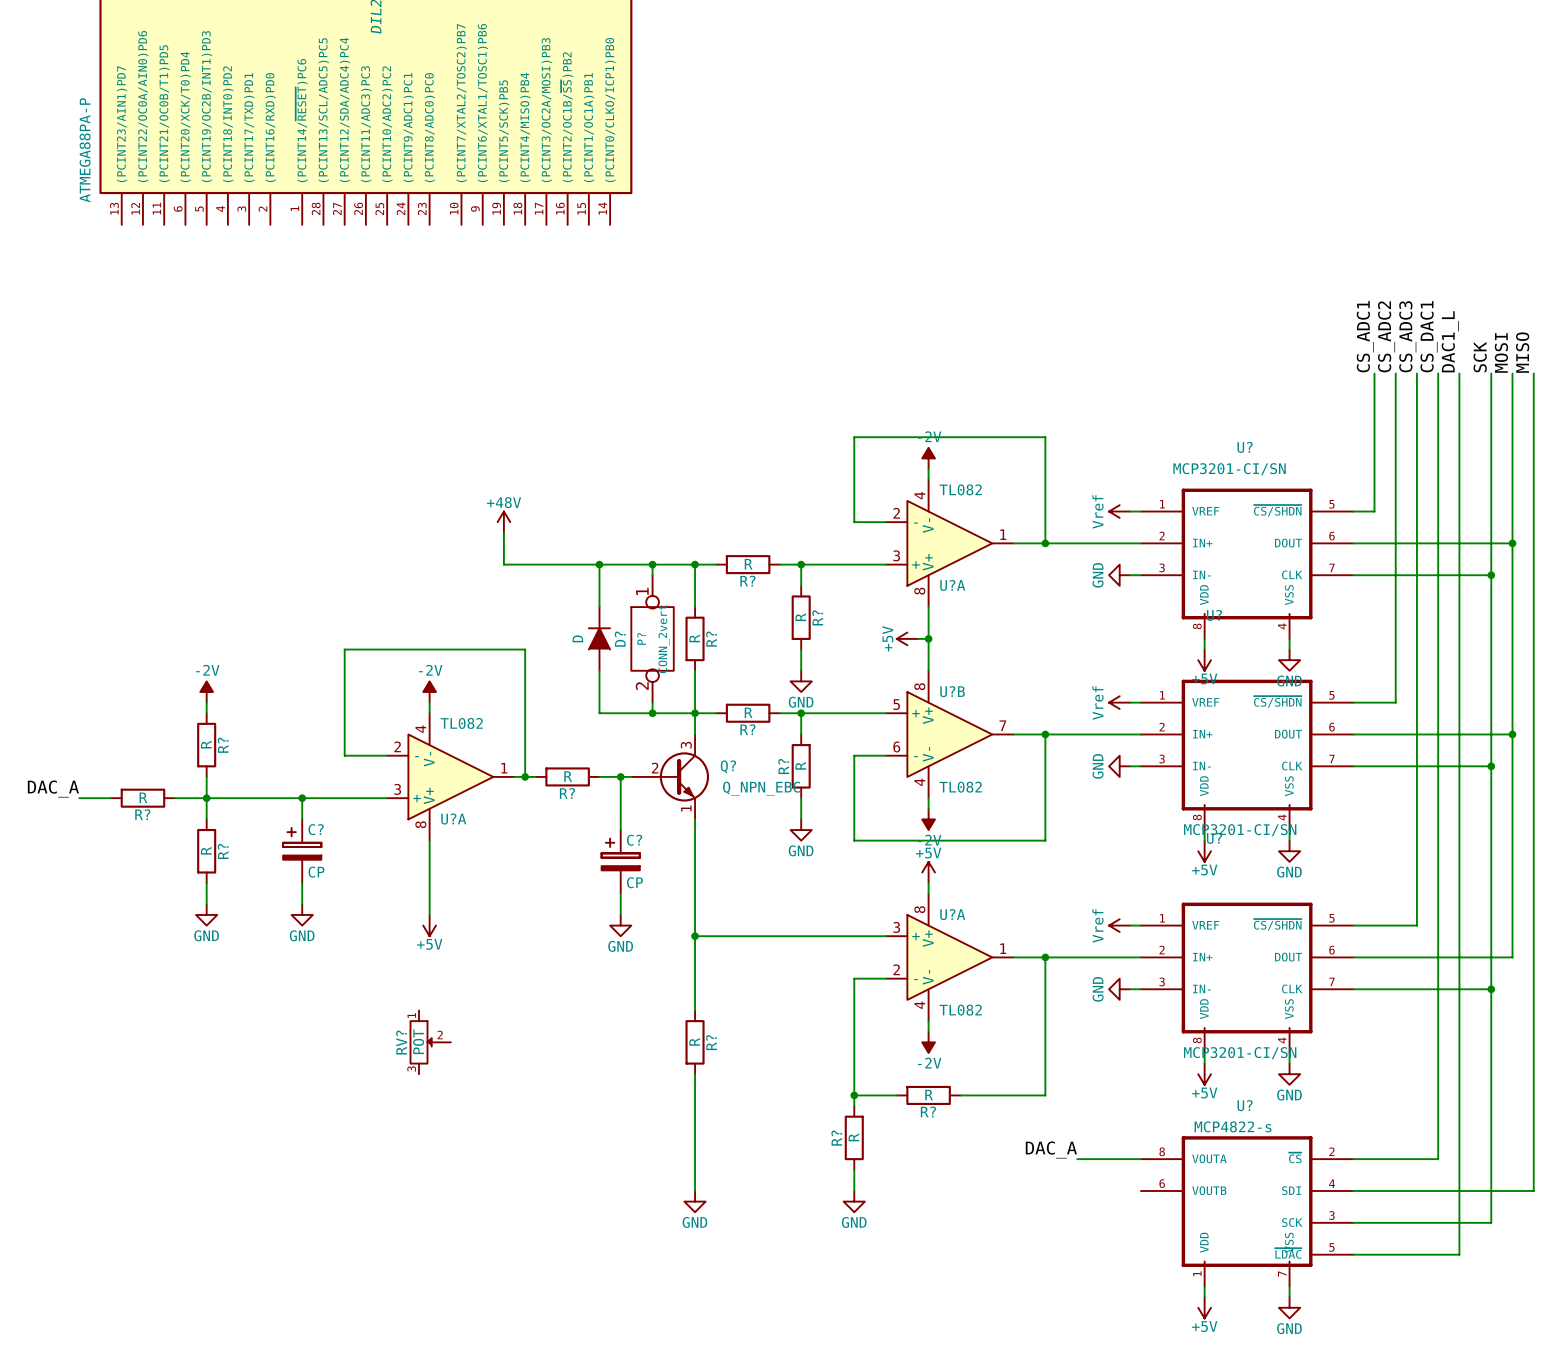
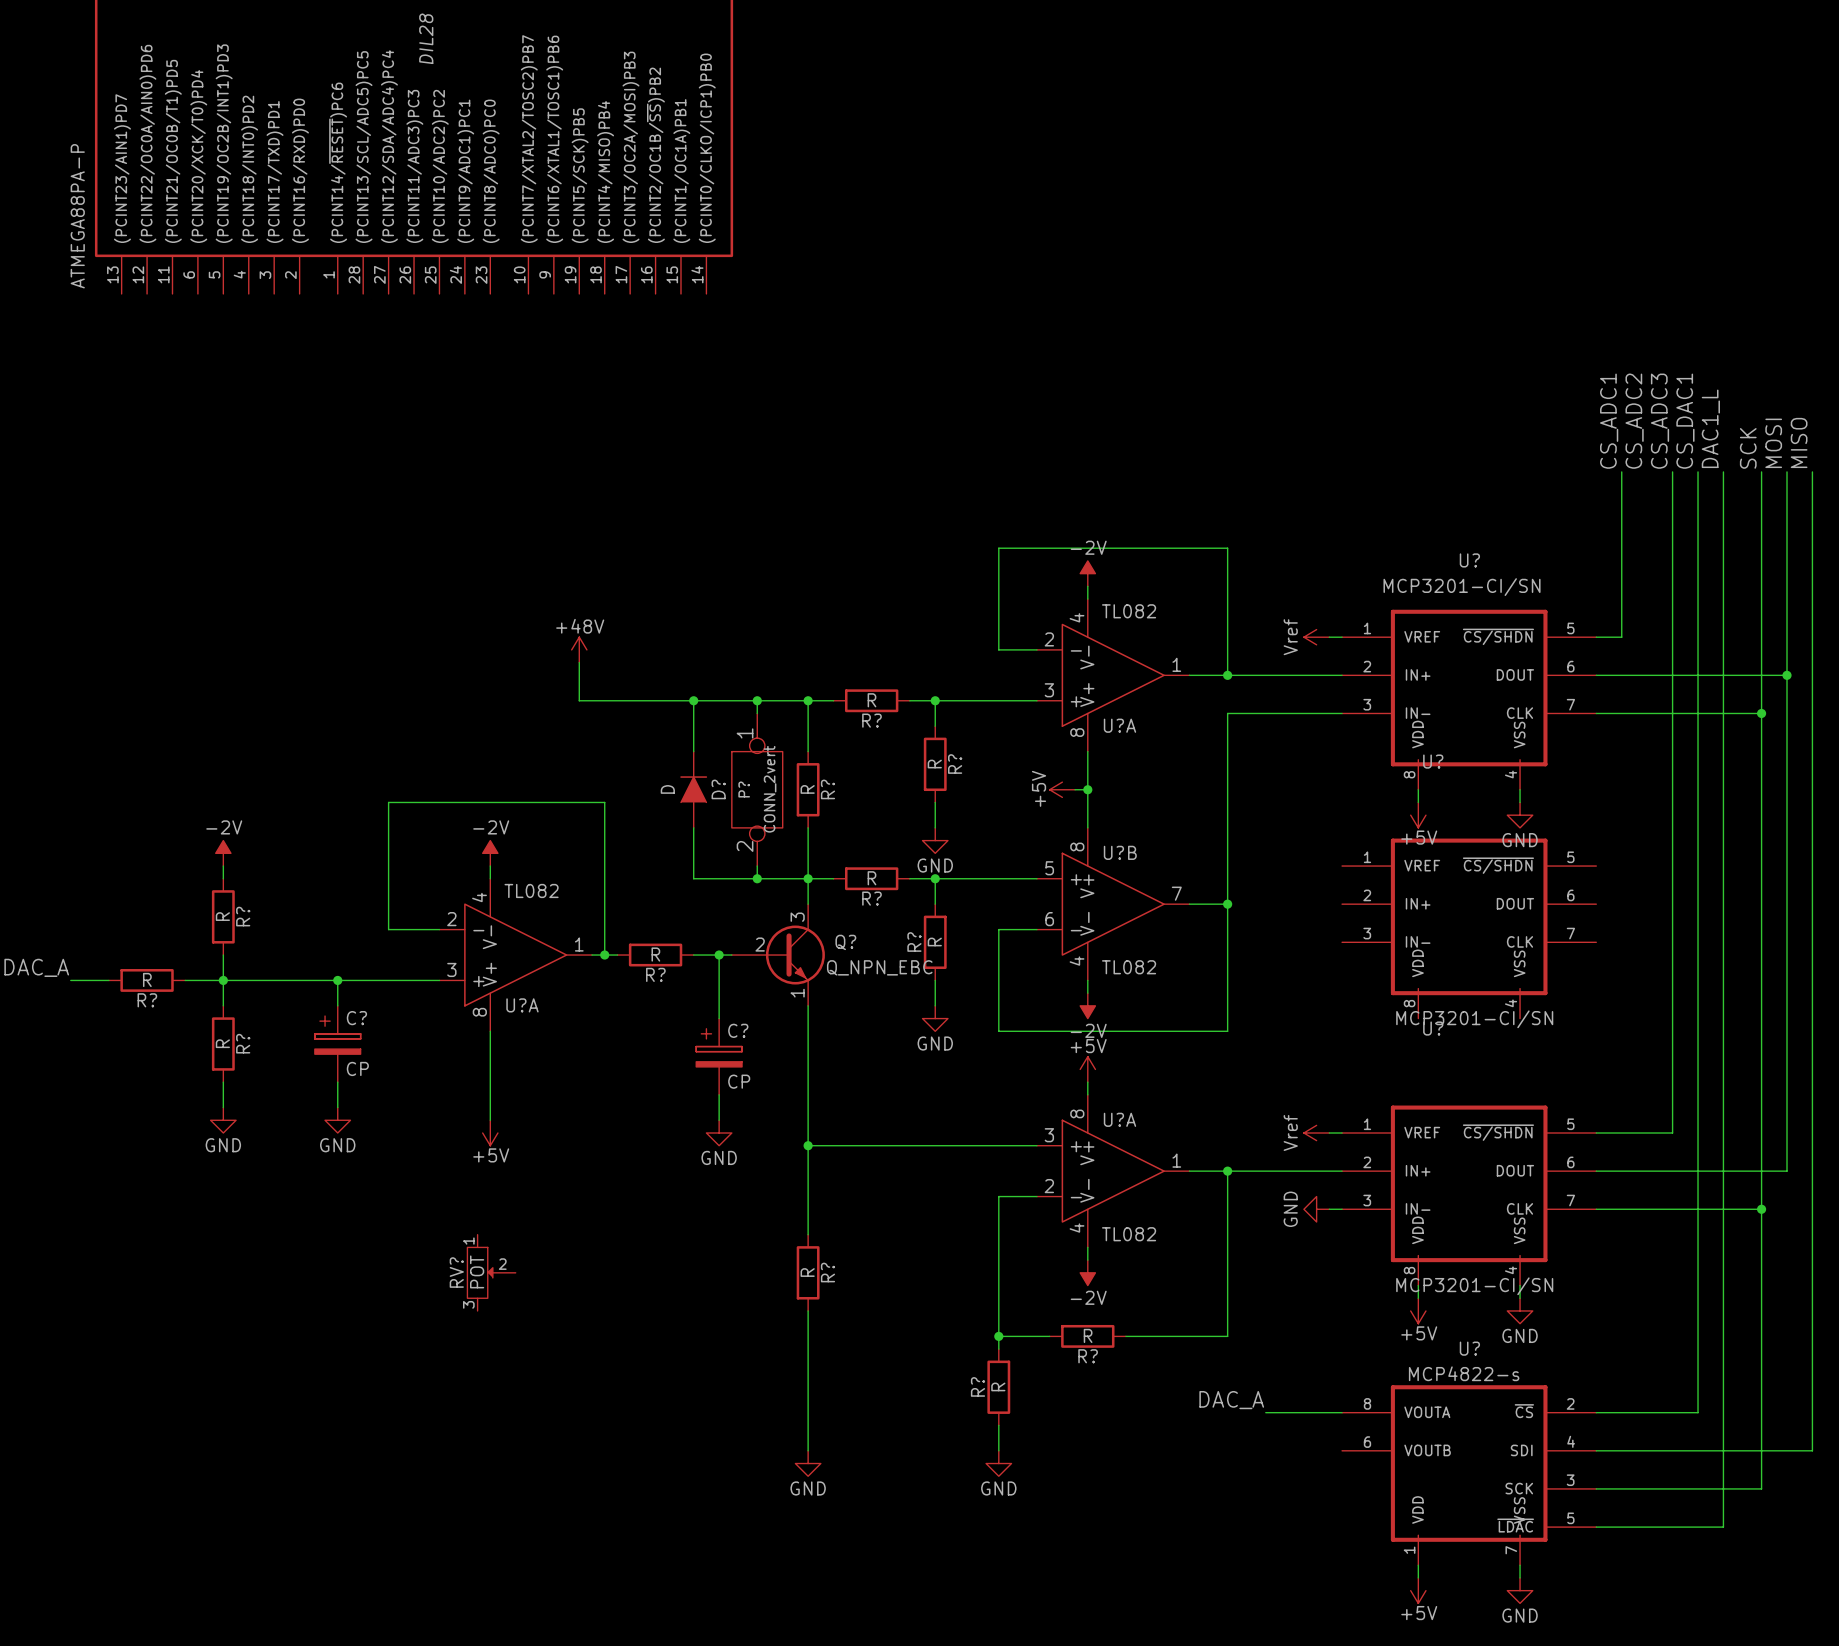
wire: (1395, 373) (1395, 702) (1353, 702) -> none
power symbol: GND (1119, 575) -> none
power symbol: Vref (1119, 702) -> none
wire: (1130, 702) (1140, 702) -> none
wire: (1045, 734) (1140, 734) -> (1227, 904) (1227, 713) (1329, 713)
wire: (1353, 734) (1512, 734) -> none
junction: (1512, 734) -> none
power symbol: GND (1119, 766) -> none
wire: (1130, 766) (1140, 766) -> none
wire: (1353, 766) (1491, 766) -> none
junction: (1491, 766) -> none
wire: (1204, 830) (1204, 840) -> none
wire: (1289, 830) (1289, 840) -> none
power symbol: +5V (1204, 851) -> none
power symbol: GND (1289, 851) -> none

